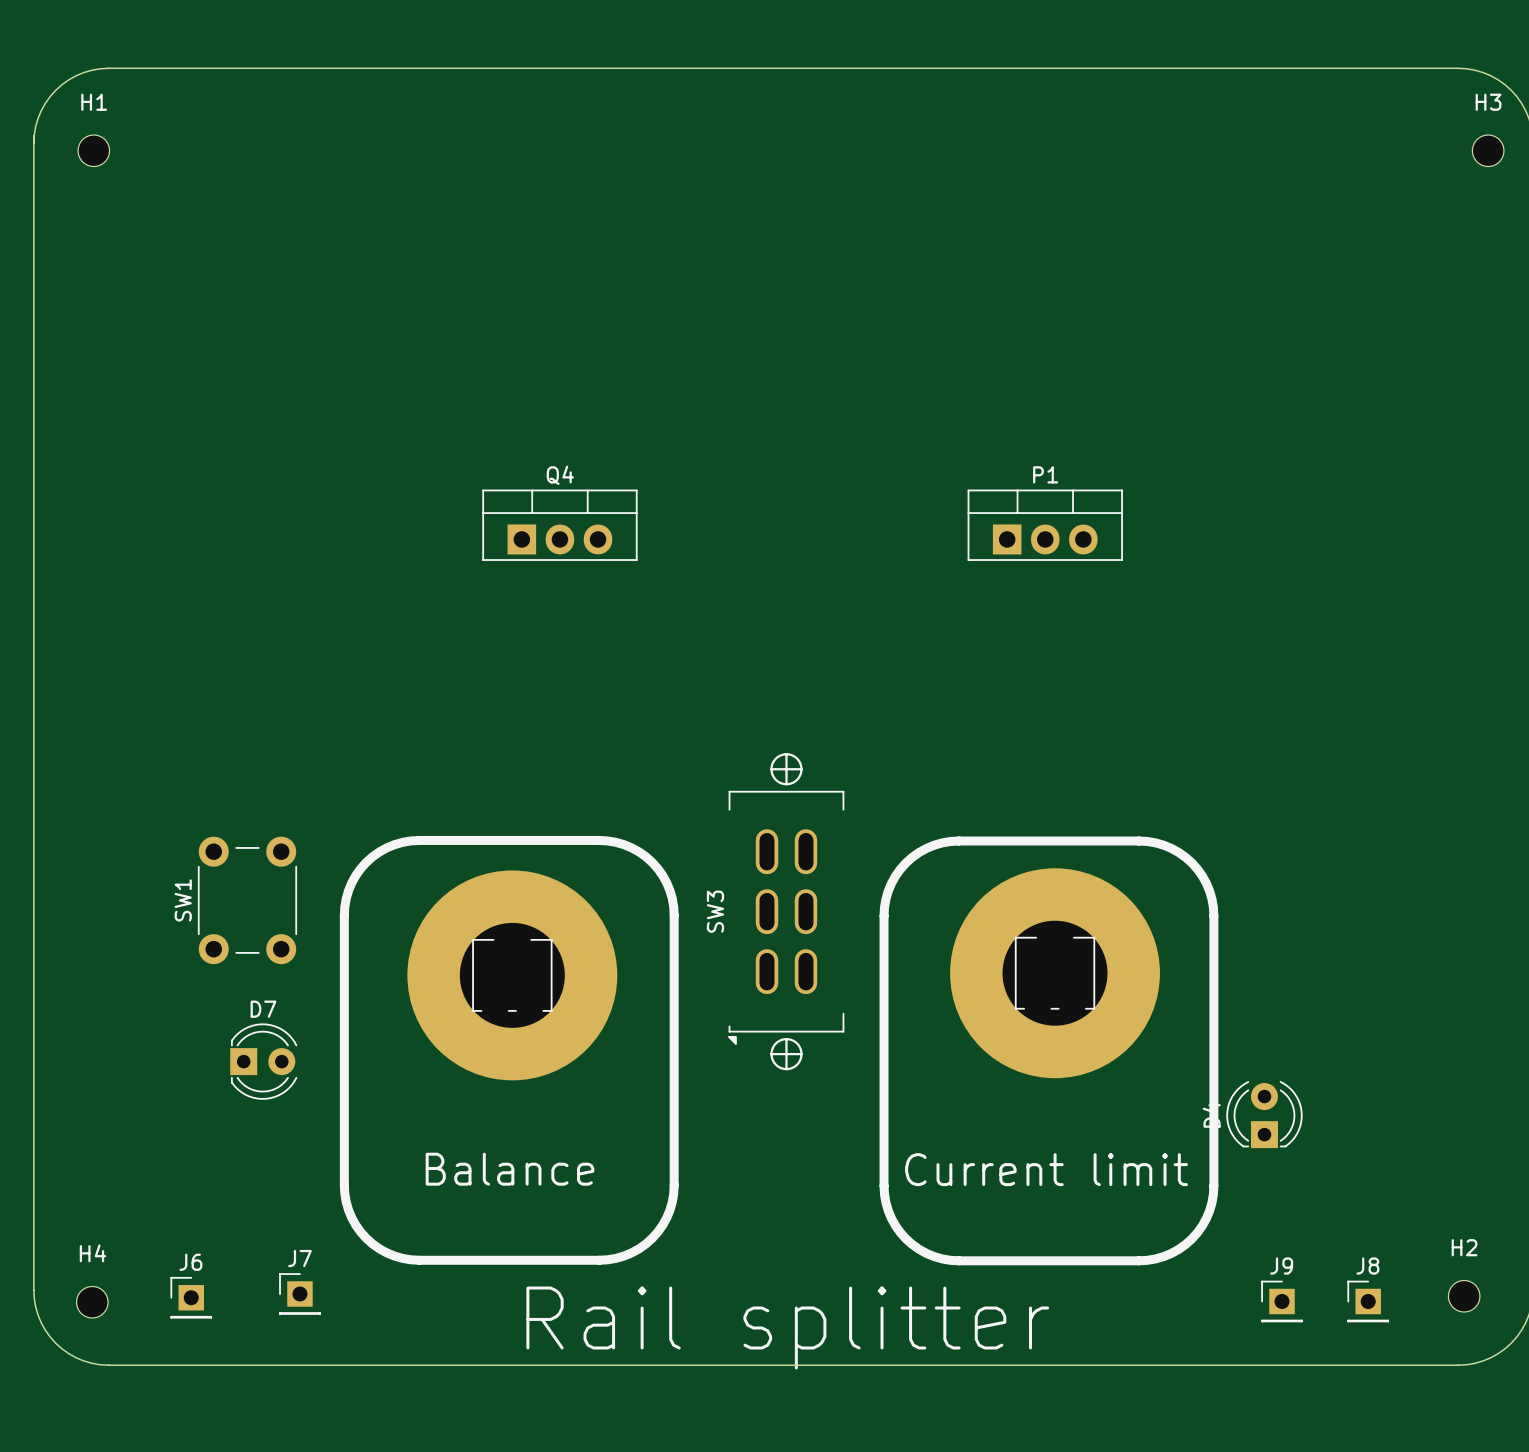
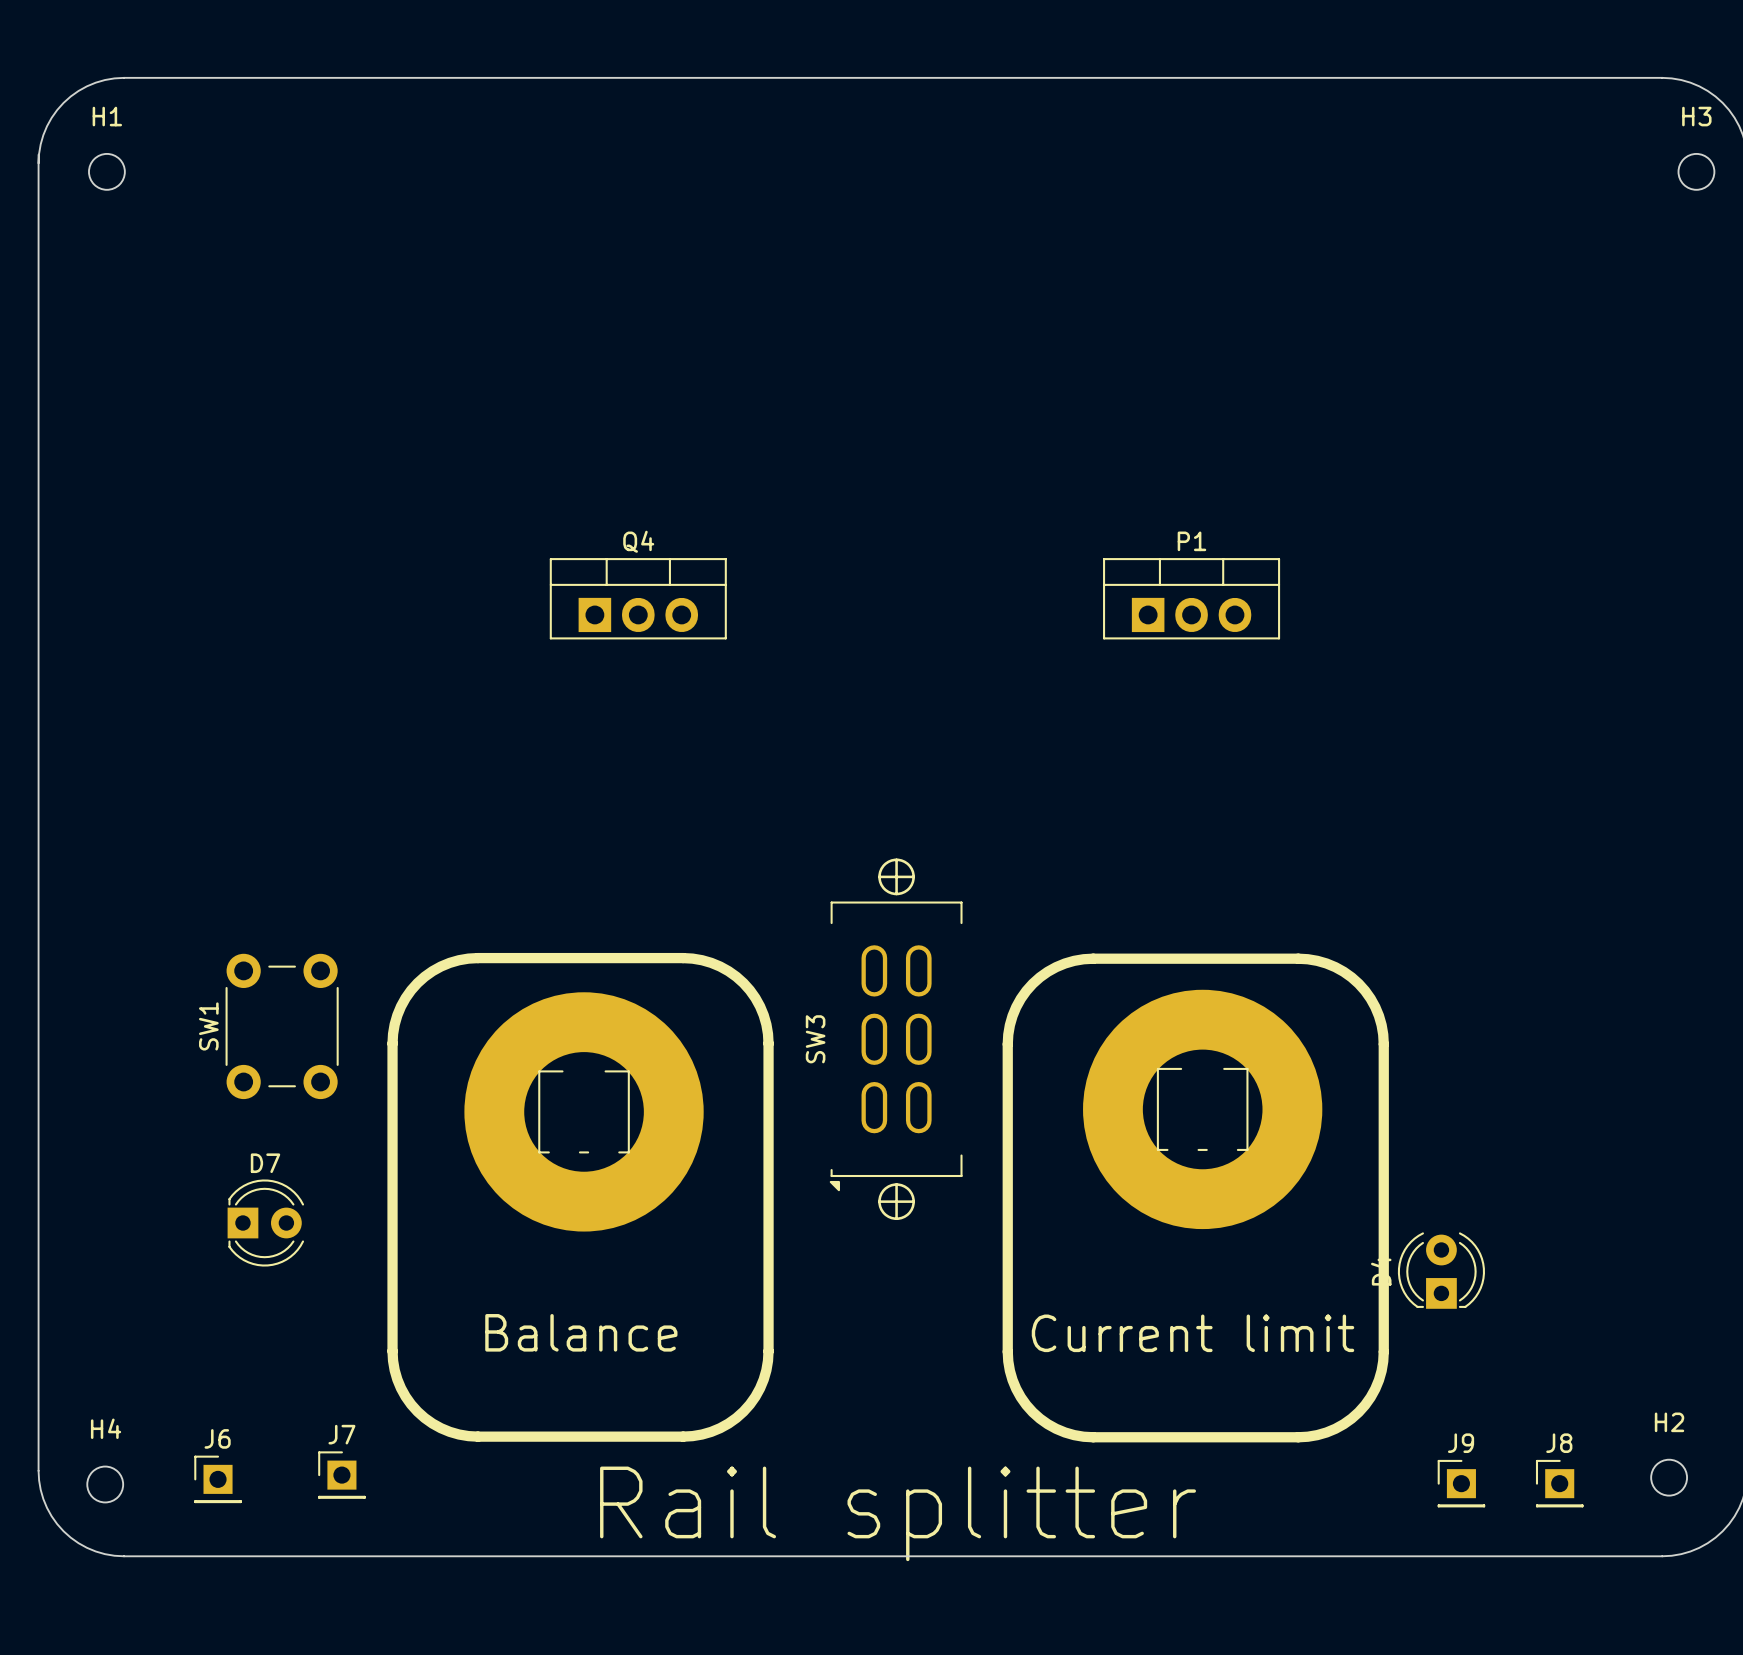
D7 position: (263, 1061) -> (265, 1223)

